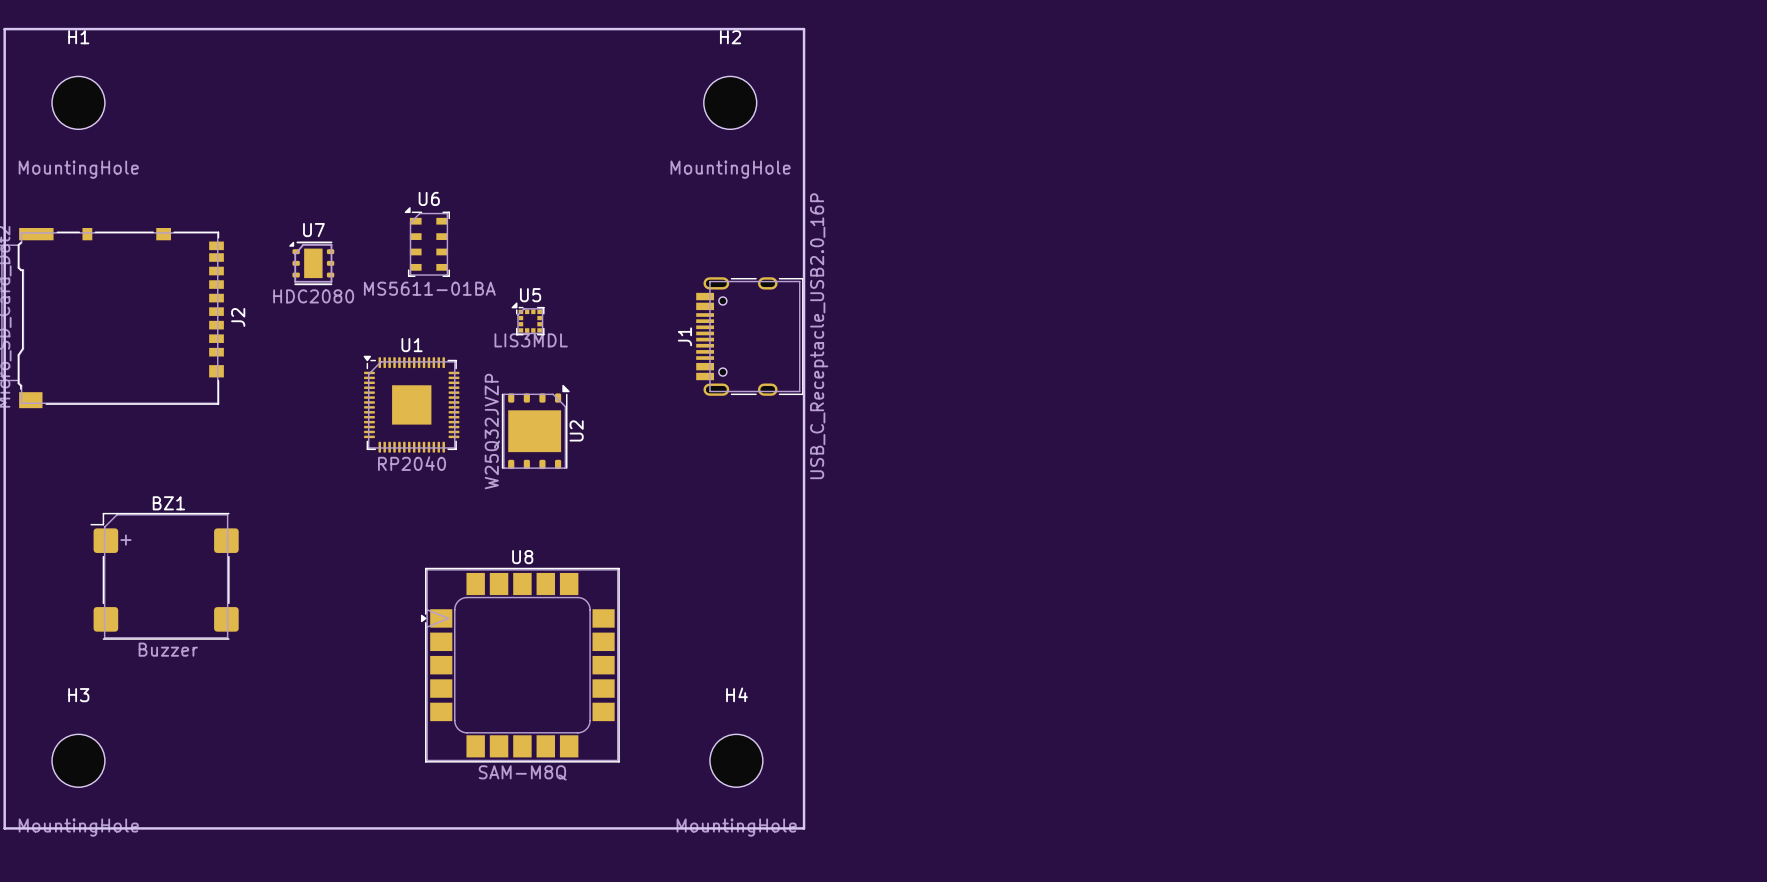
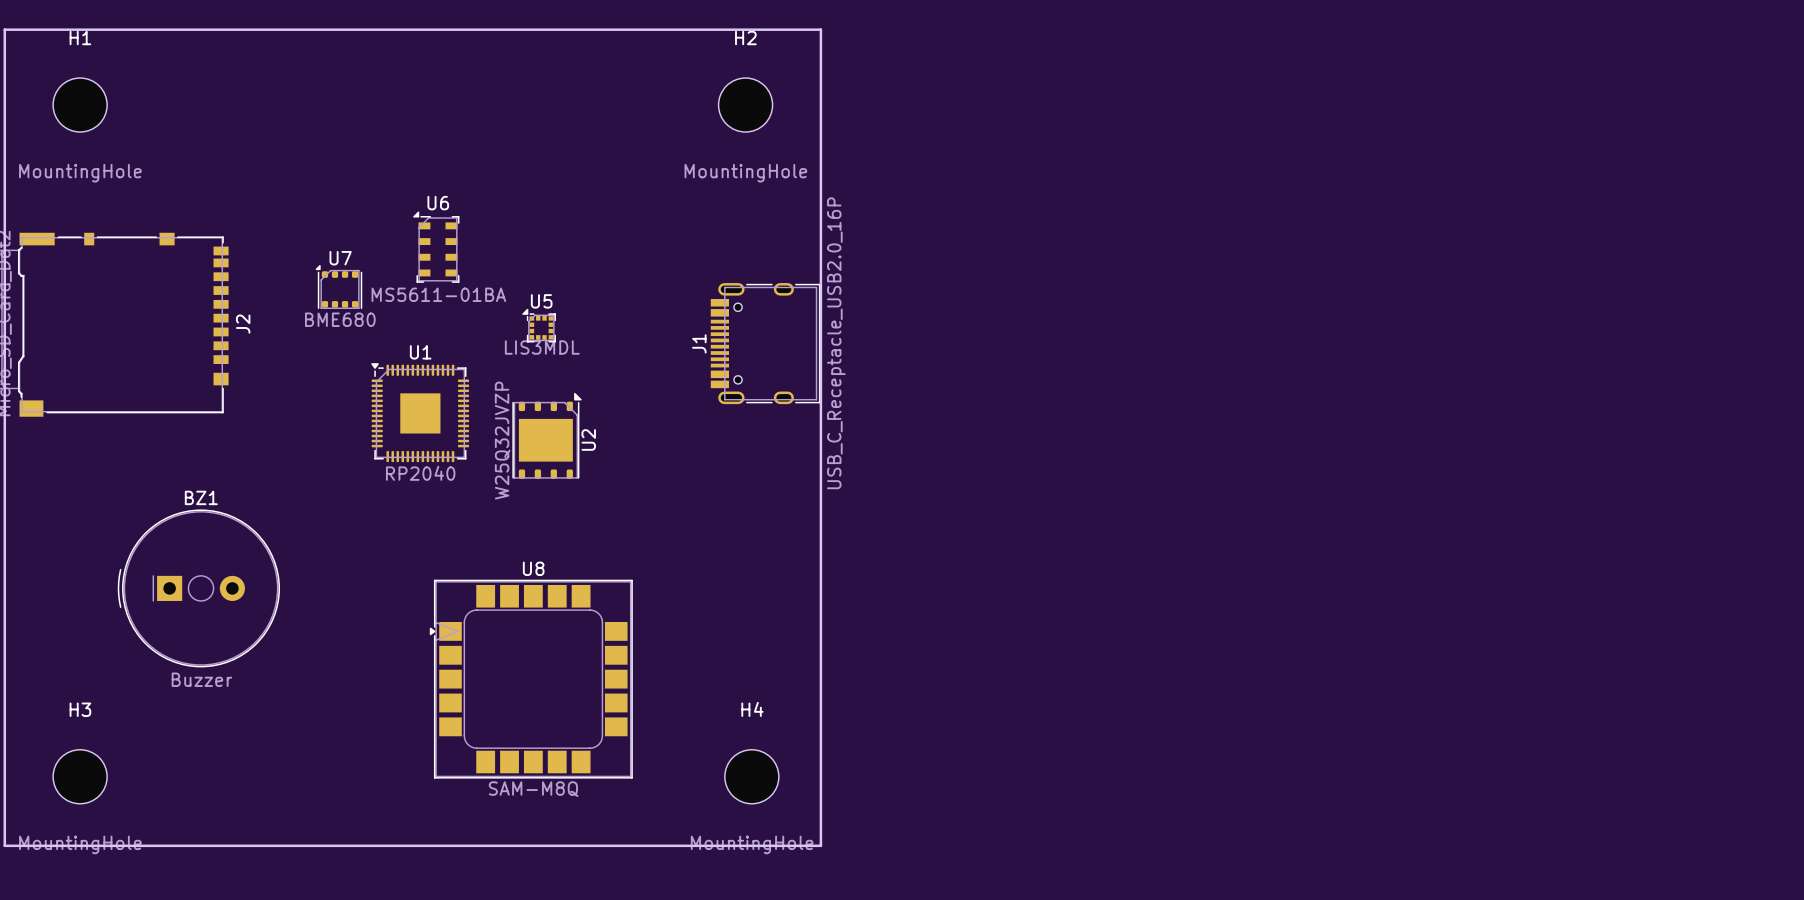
U7 footprint: [289, 241, 335, 286] -> [315, 265, 363, 310]
U7 value: HDC2080 (313, 296) -> BME680 (340, 319)
BZ1 footprint: [90, 512, 239, 640] -> [117, 509, 280, 668]

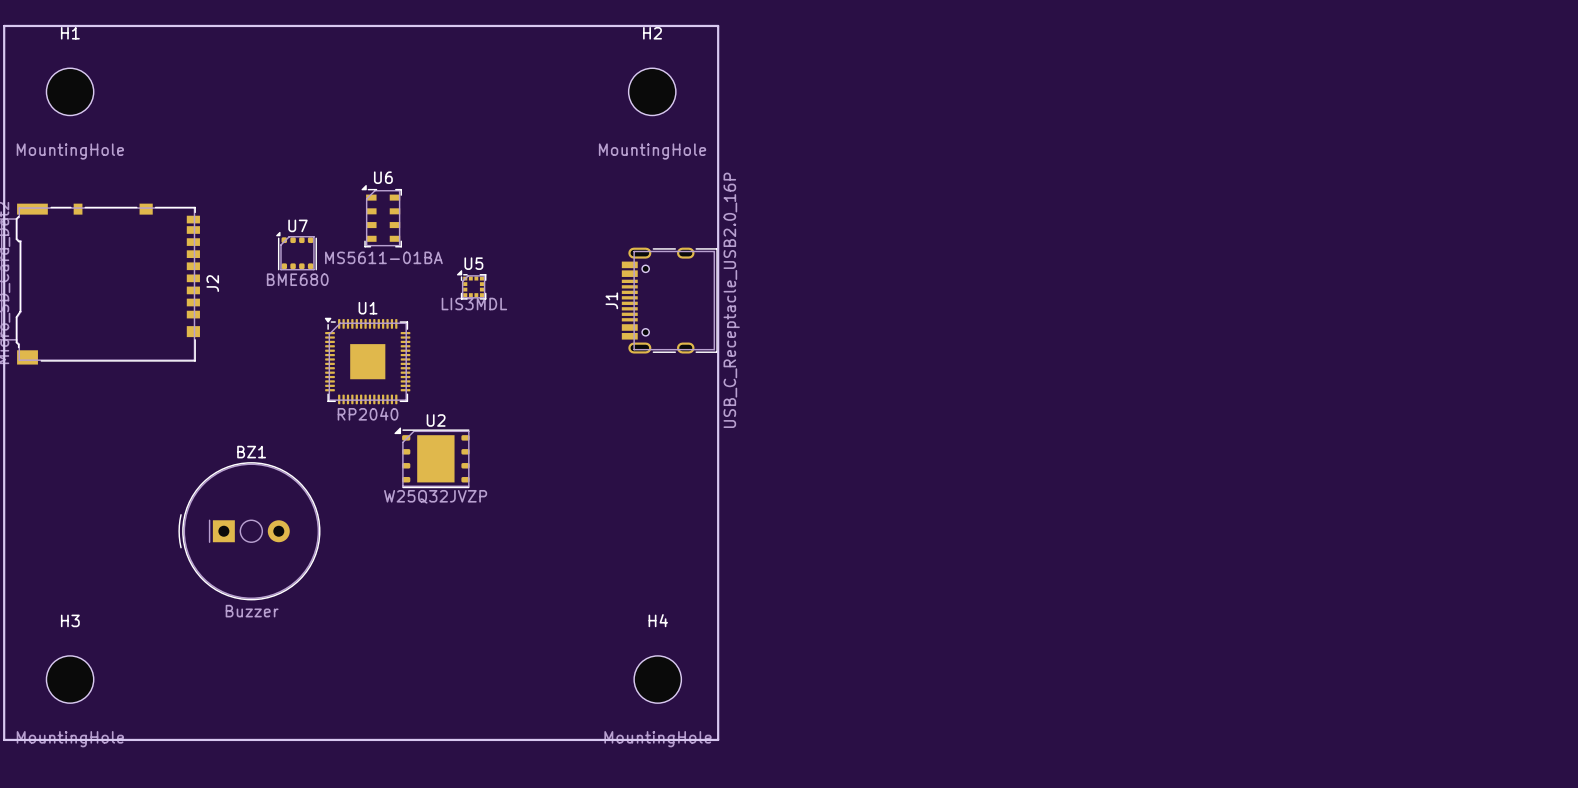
U2 rotation: 0° (547, 435) -> 90° counterclockwise (432, 457)
U2 position: (547, 435) -> (432, 457)
BZ1 position: (198, 588) -> (249, 531)
U8: SAM-M8Q (531, 679) -> none

